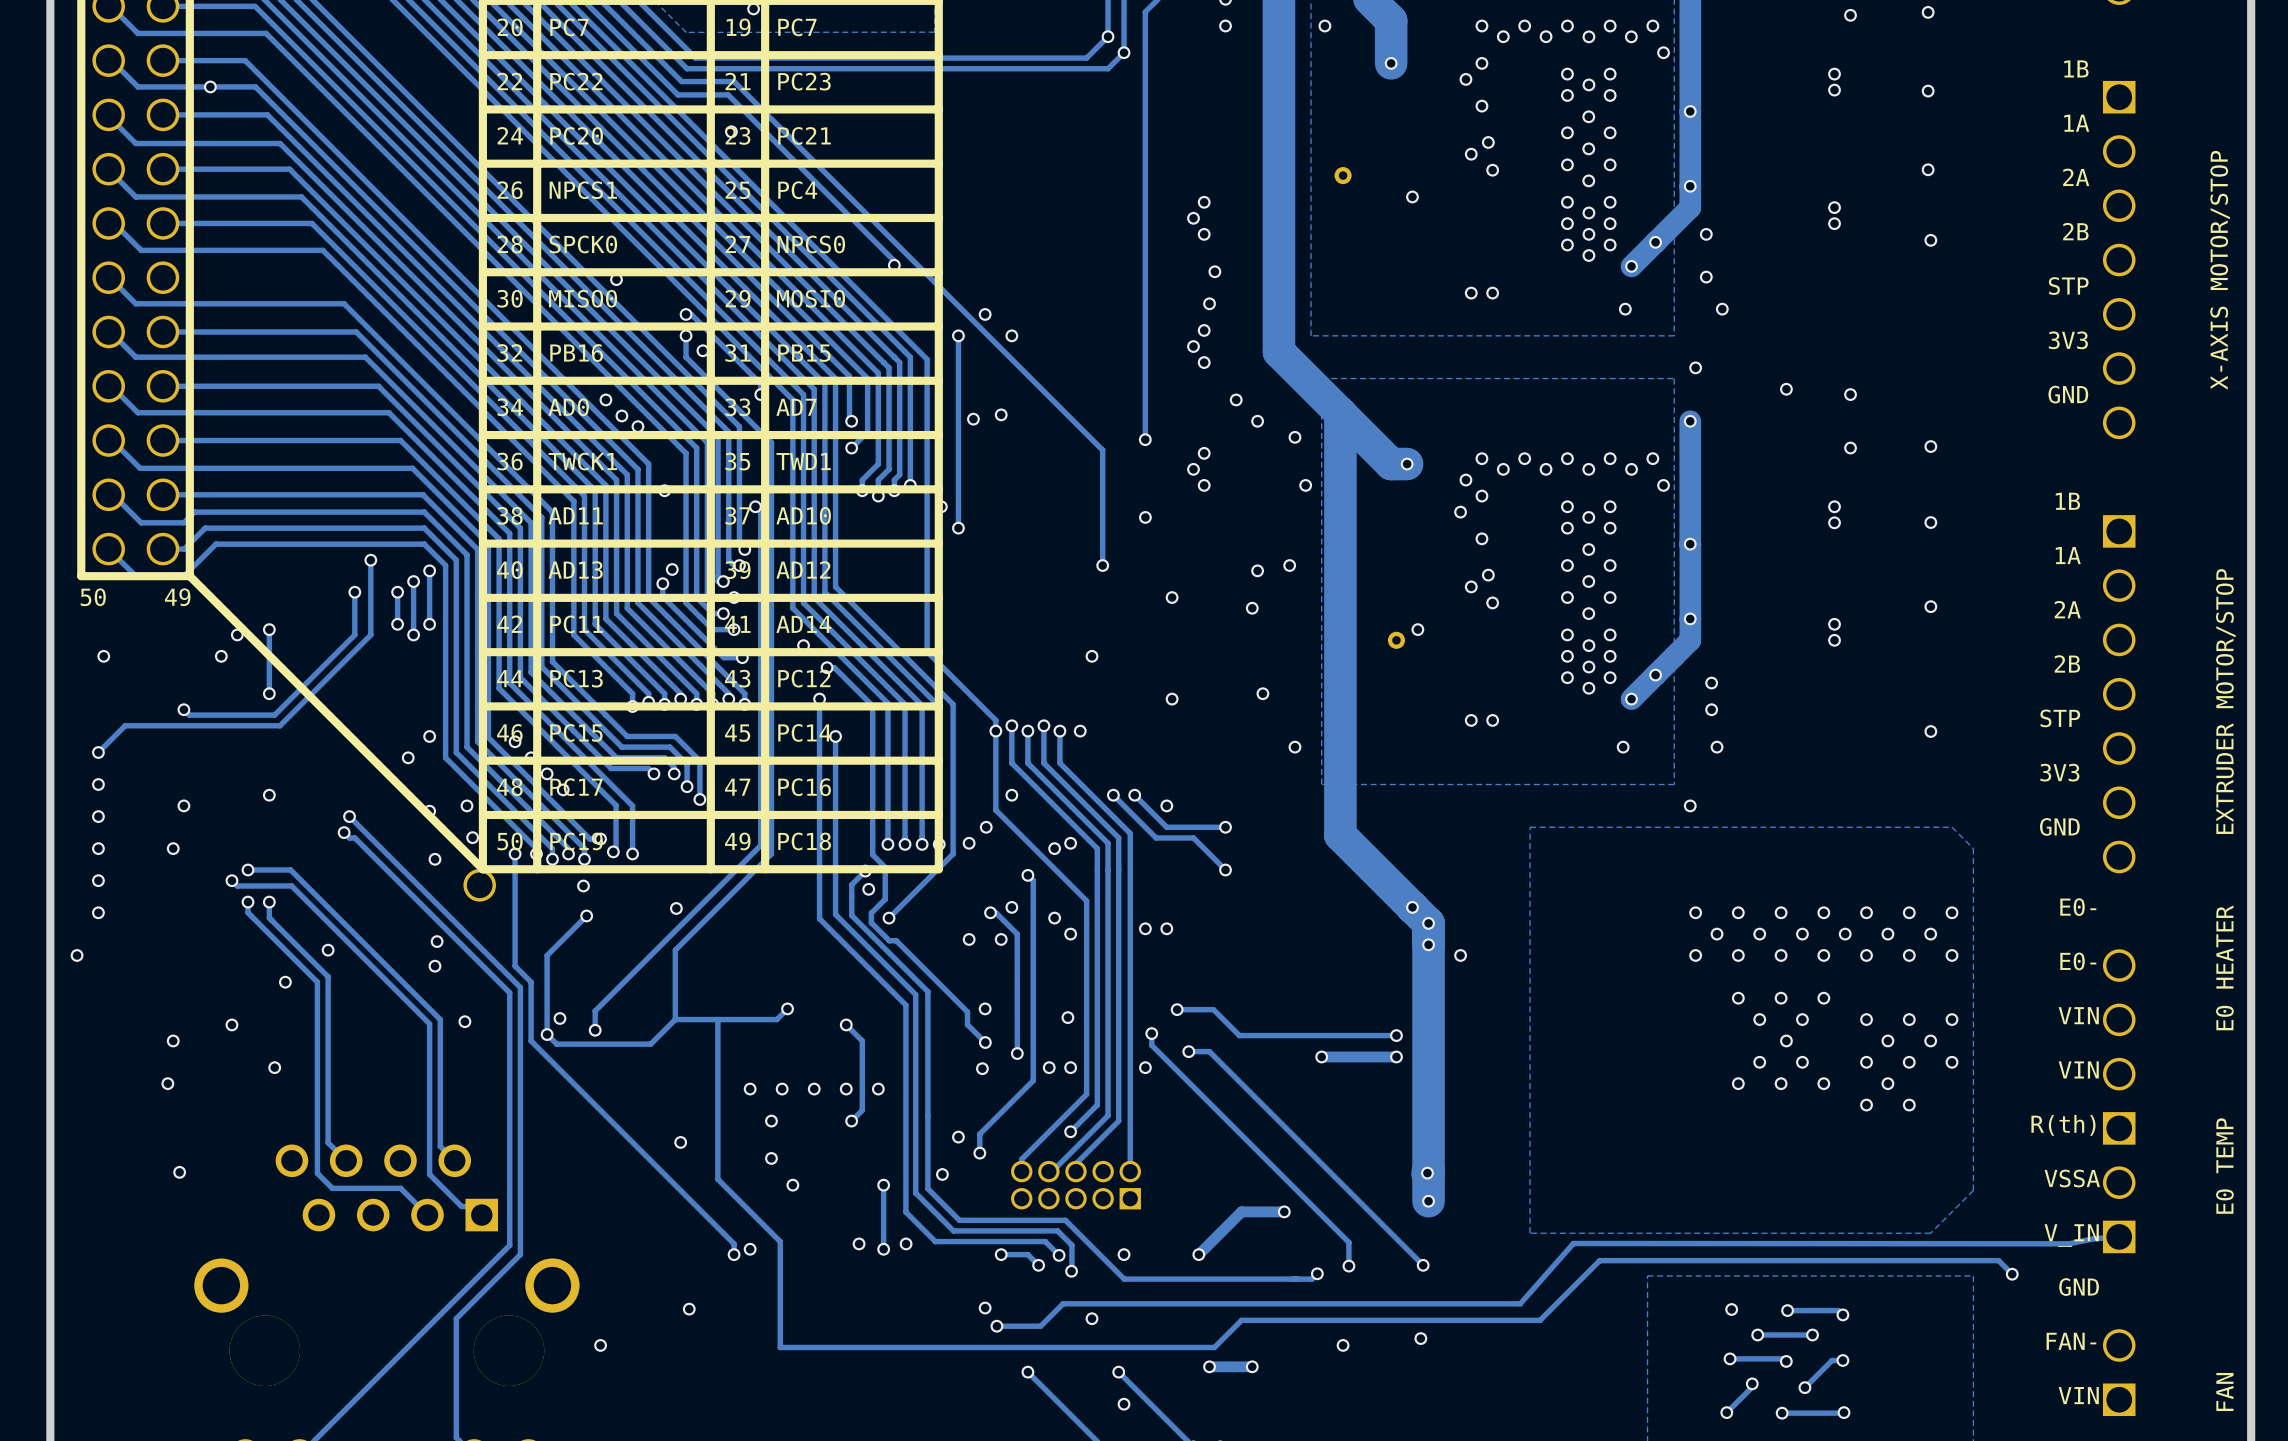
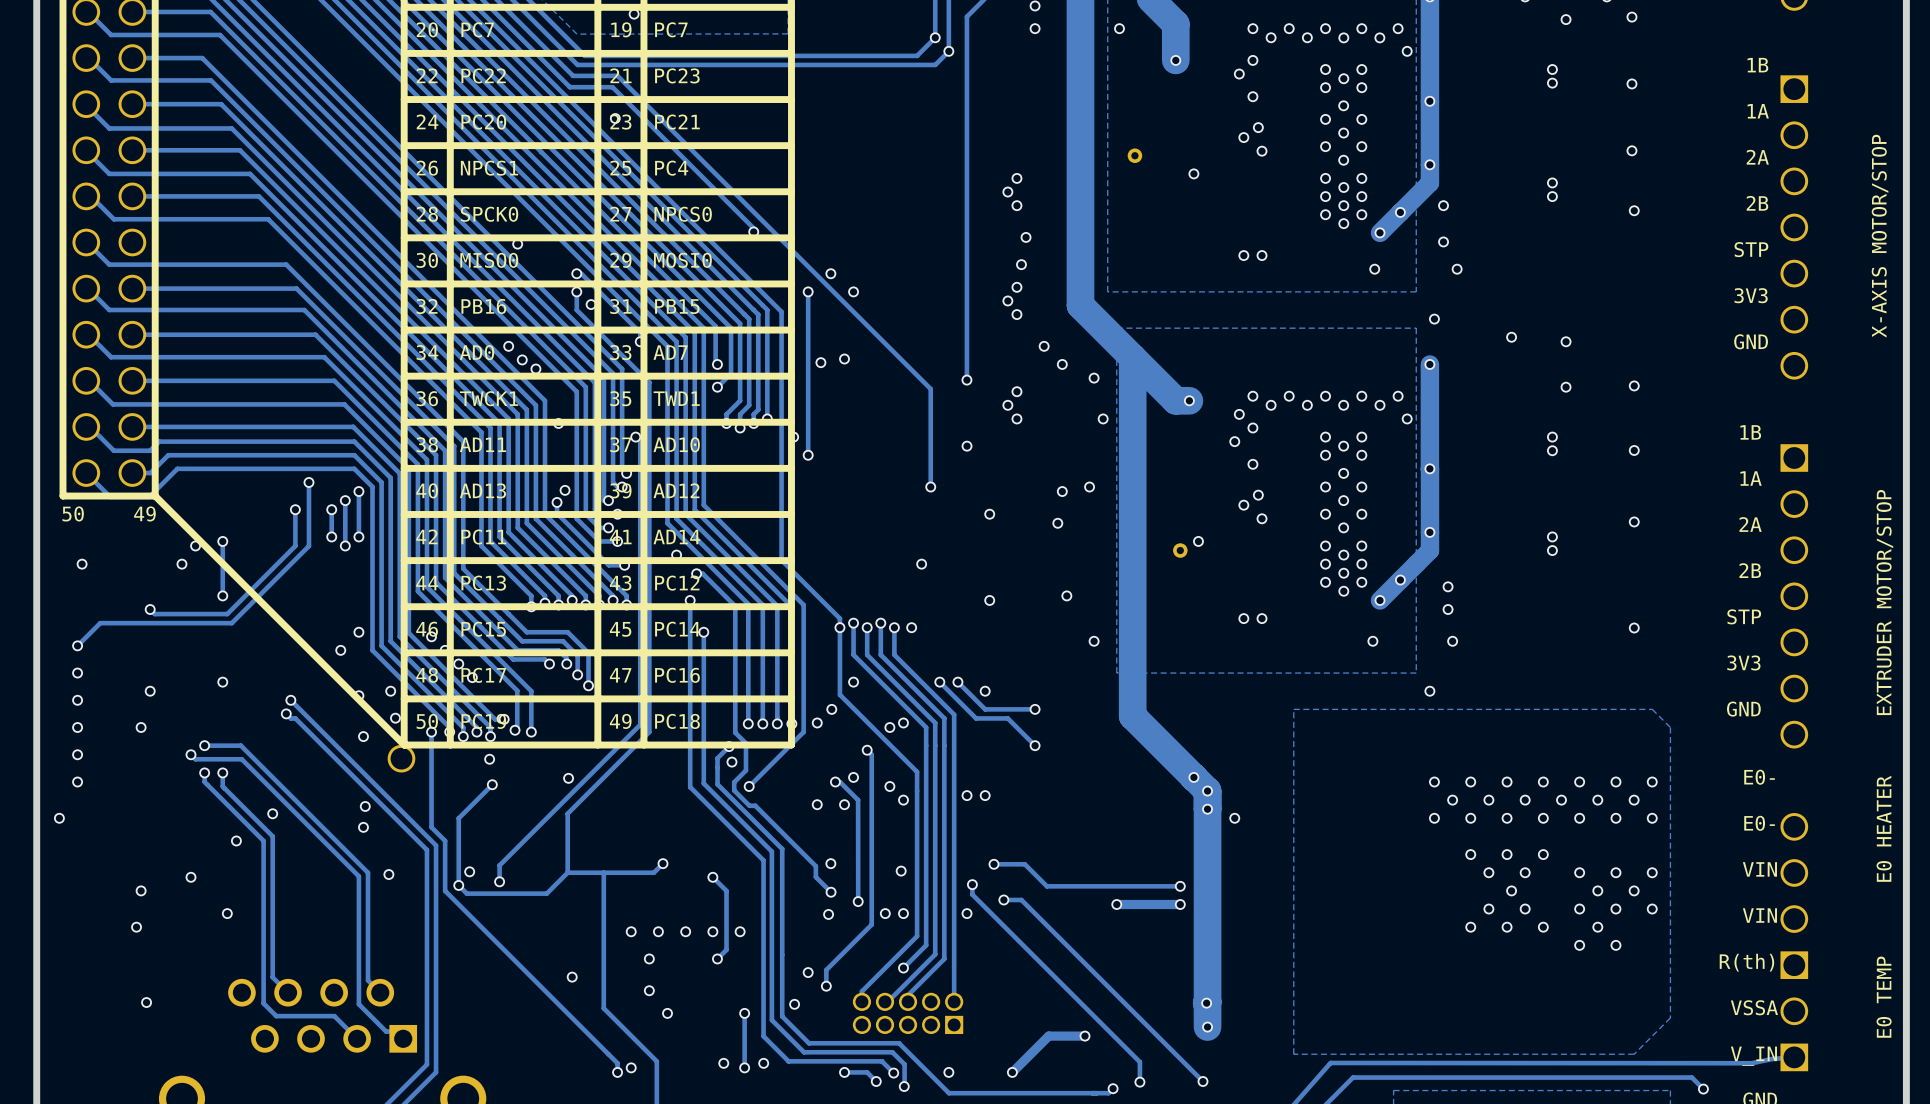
via: (210, 86) -> none

